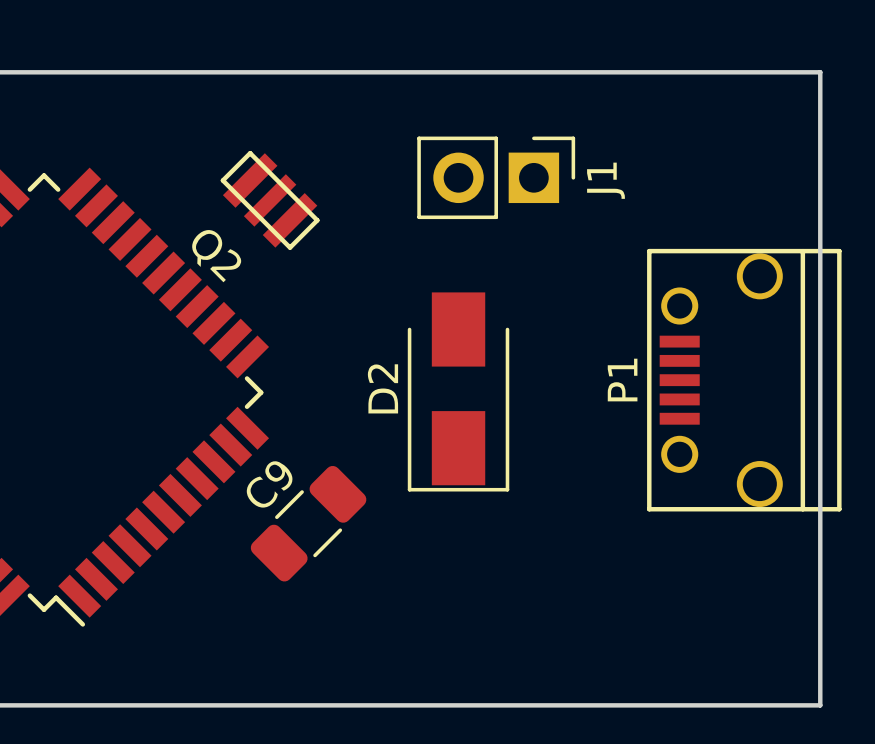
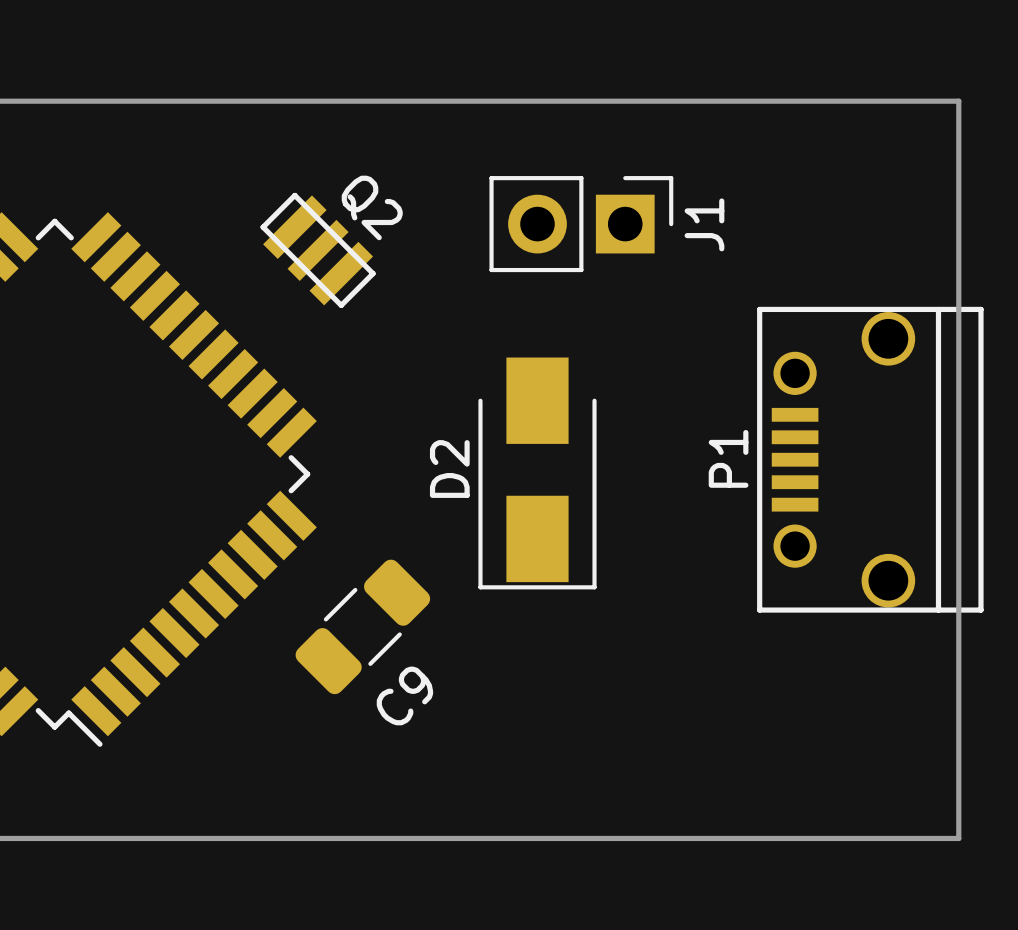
Q2 name position: Q2 (216, 256) -> Q2 (372, 207)
C9 name position: C9 (269, 484) -> C9 (404, 695)

